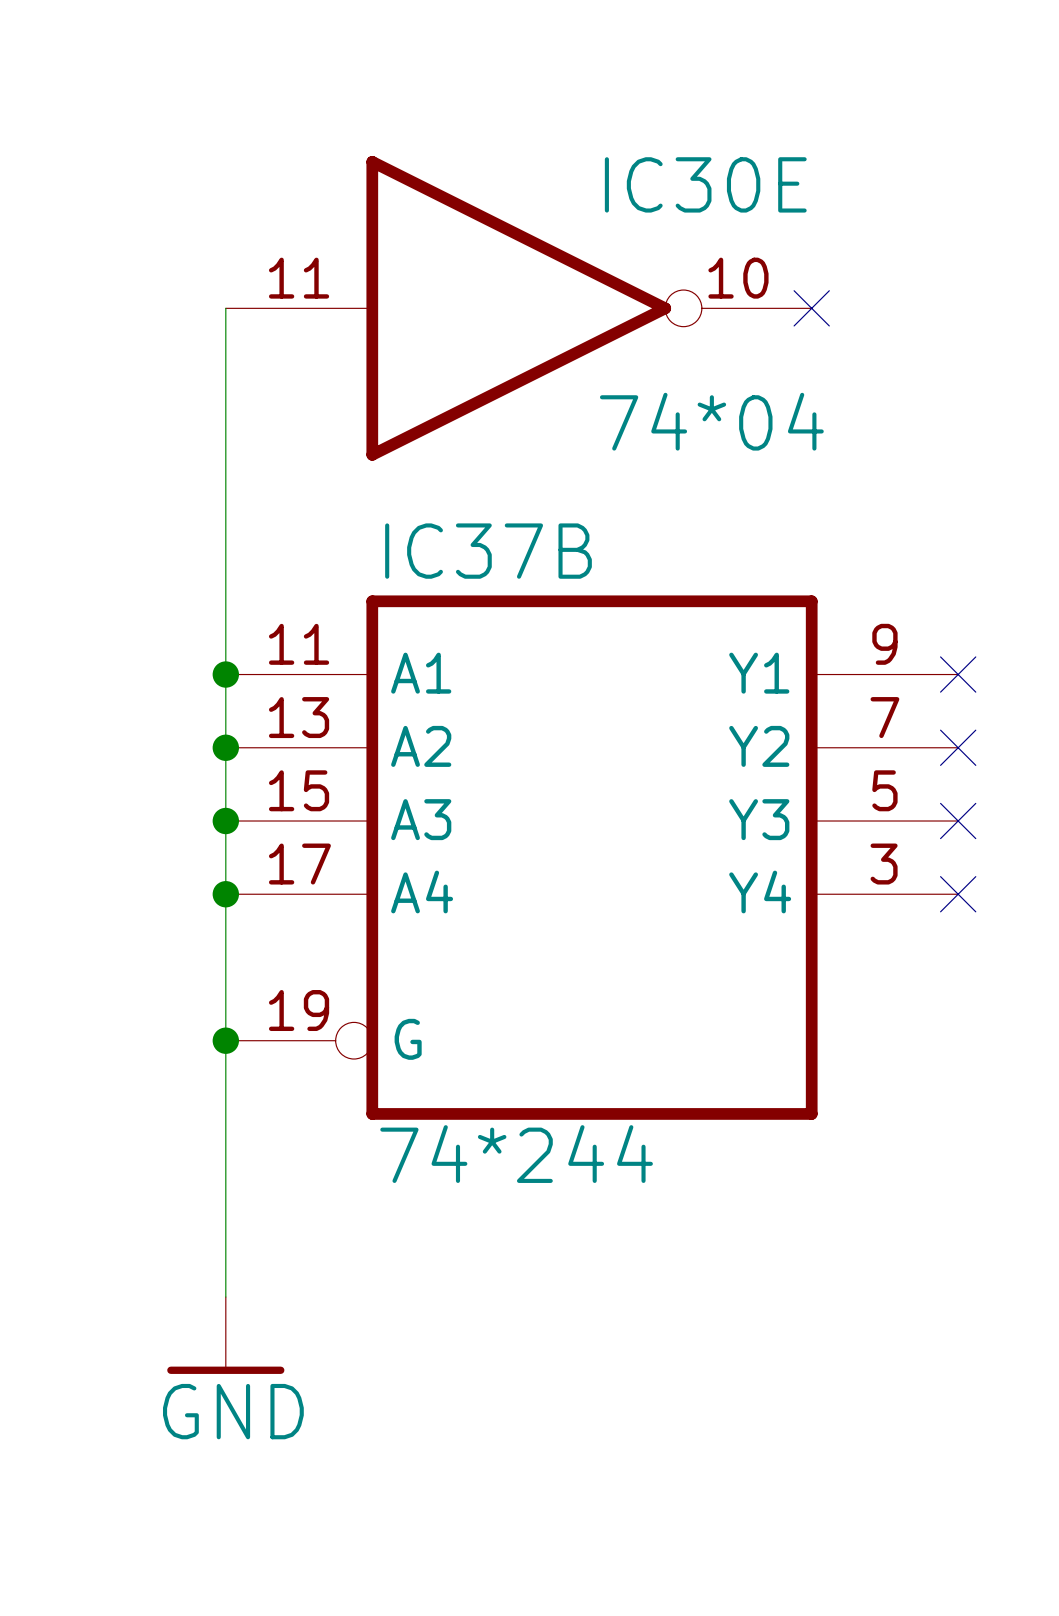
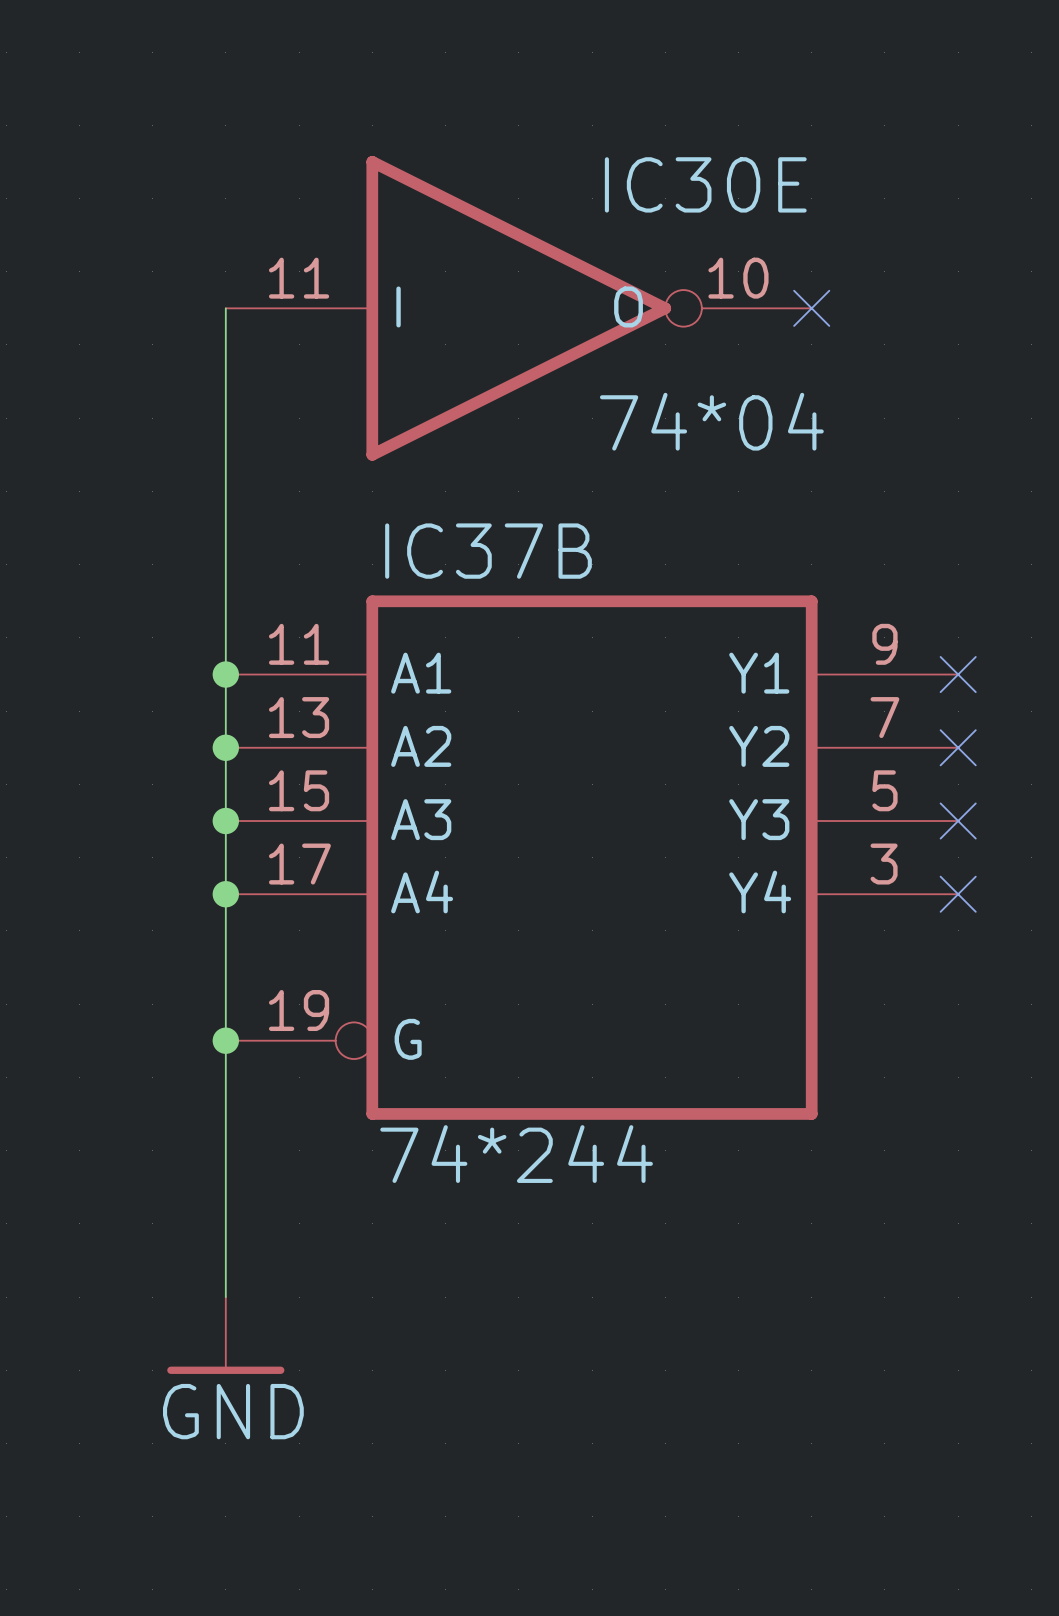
IC30E pin name: none -> I (398, 306)
IC30E pin name: none -> O (628, 306)

